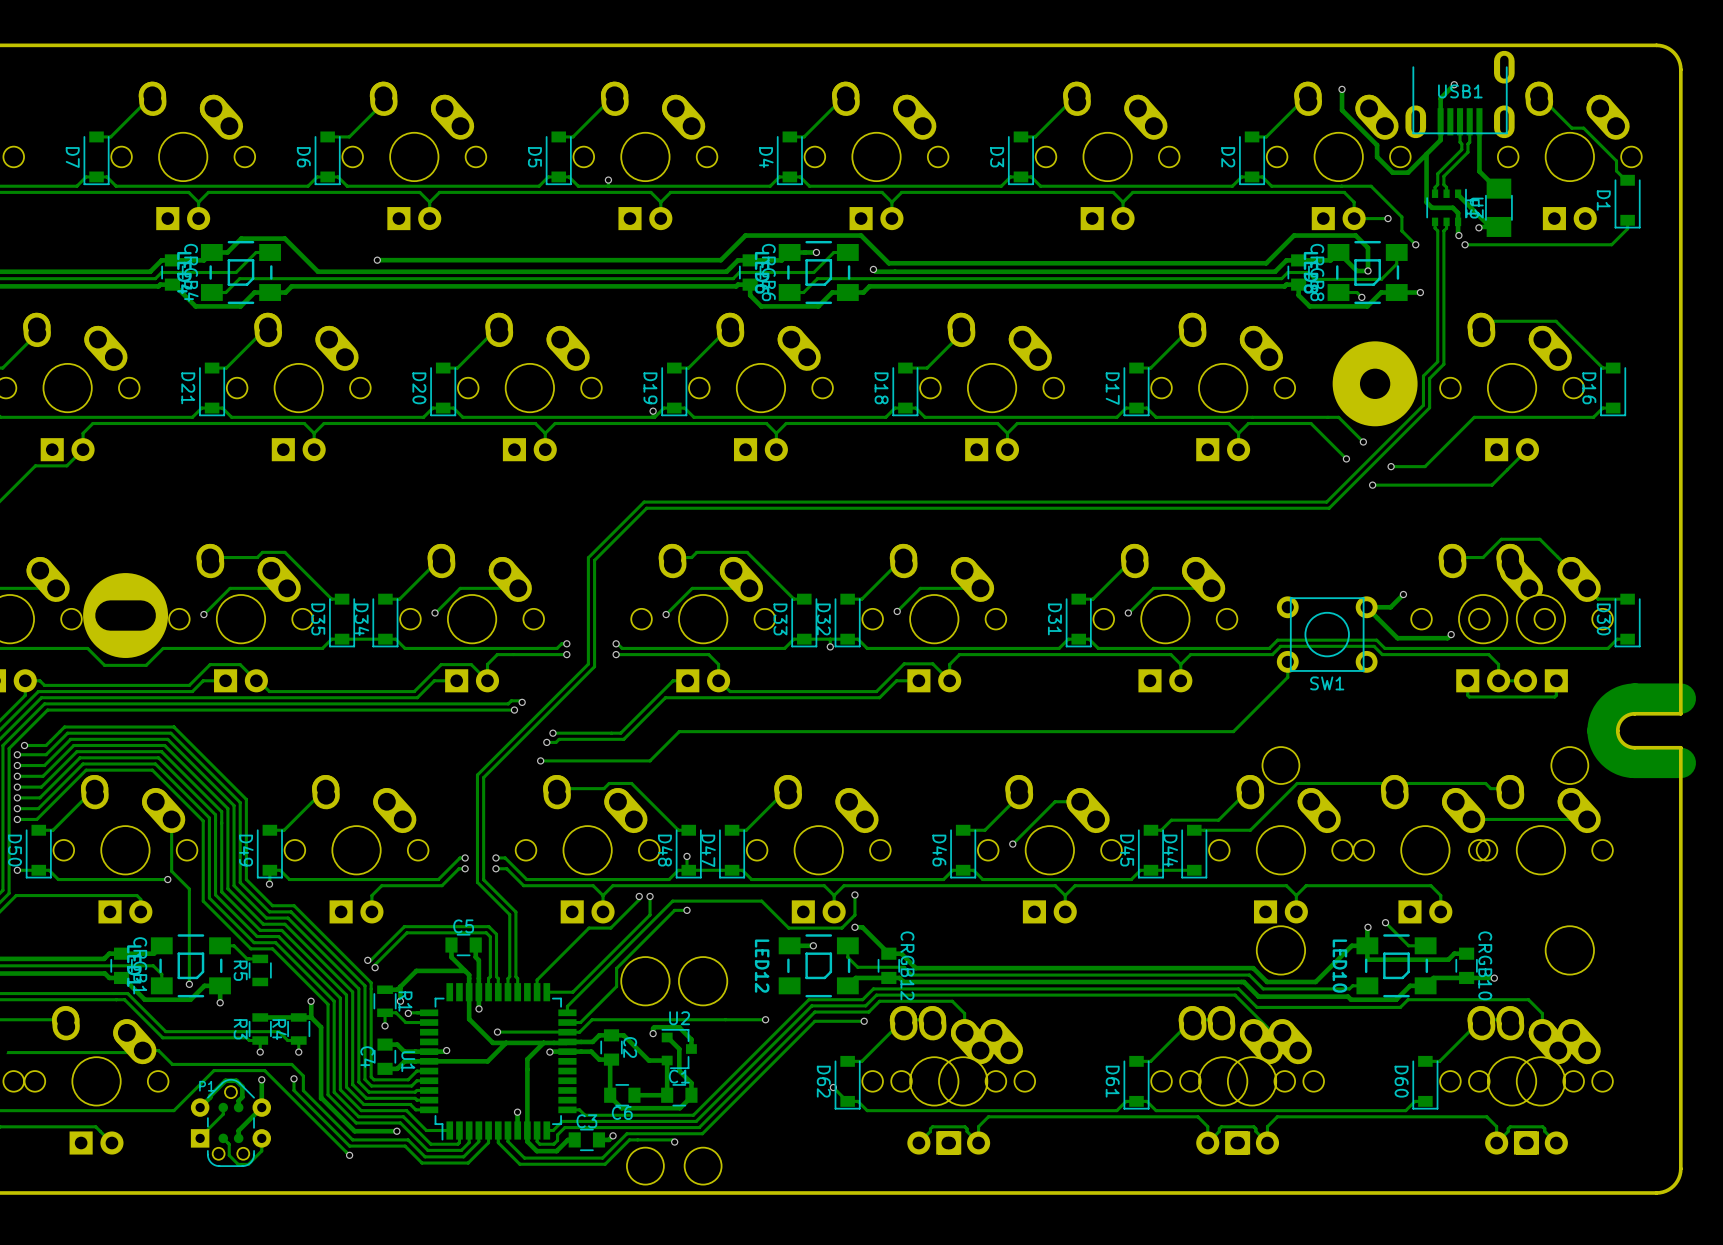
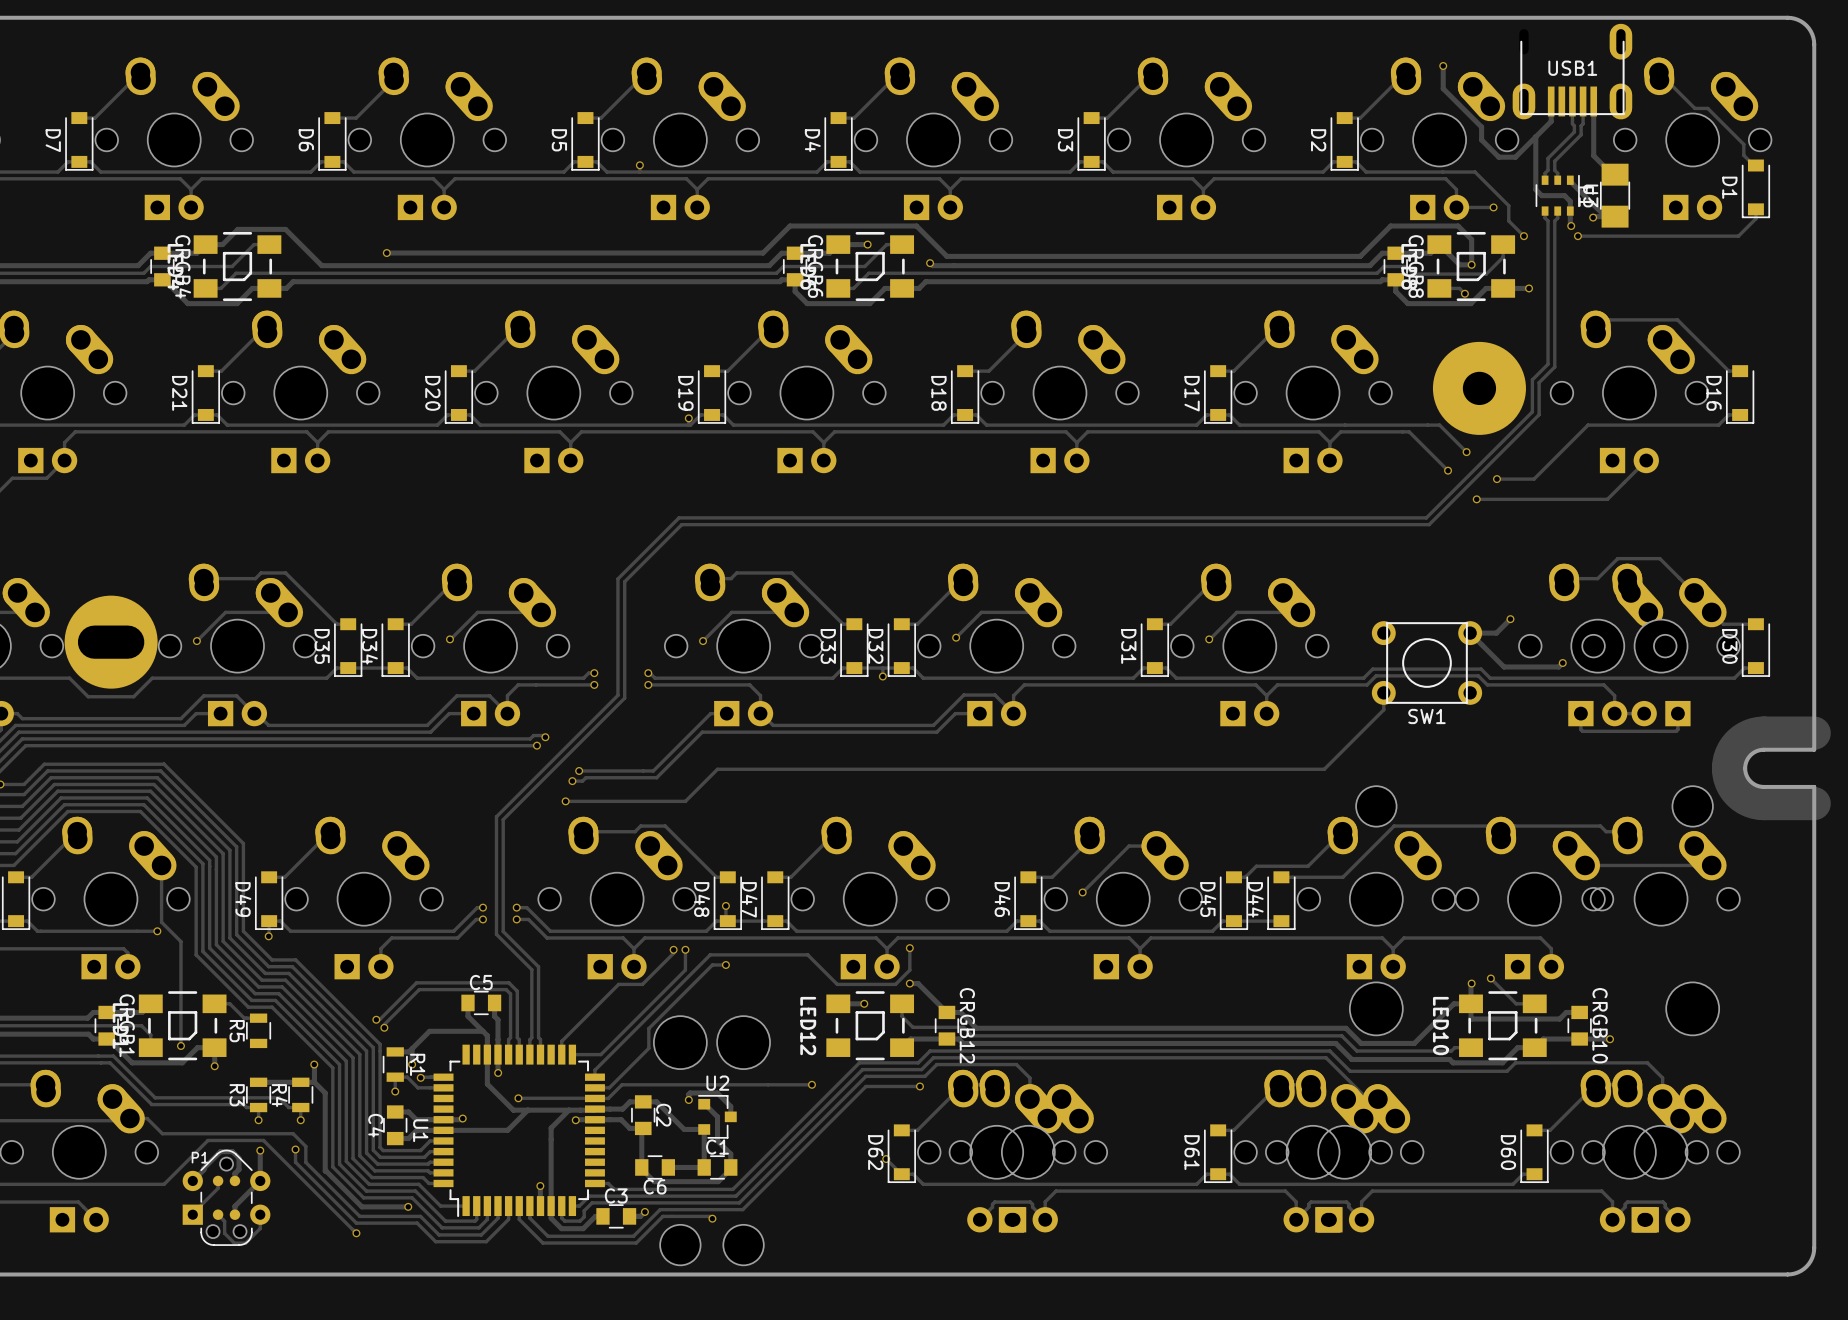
track: (1454, 84) (1440, 98) (1440, 121) -> none
via: (1454, 84) -> none

